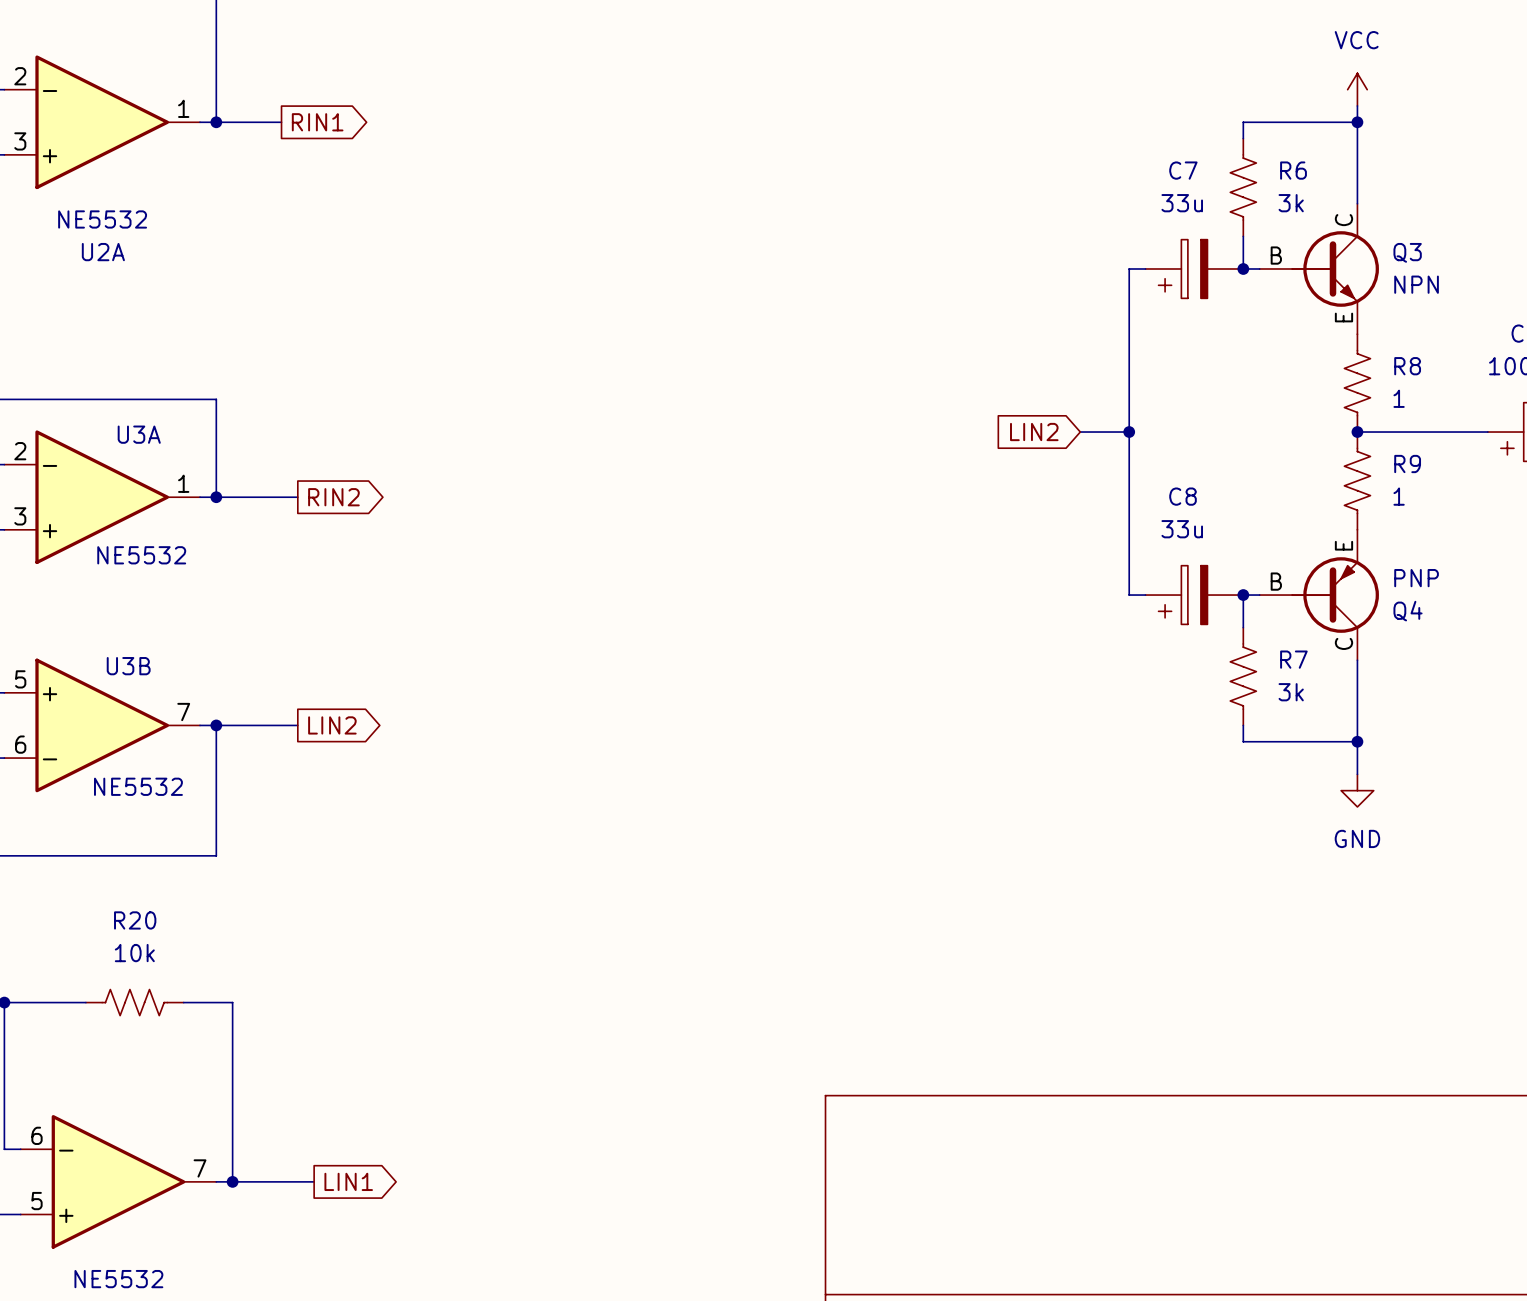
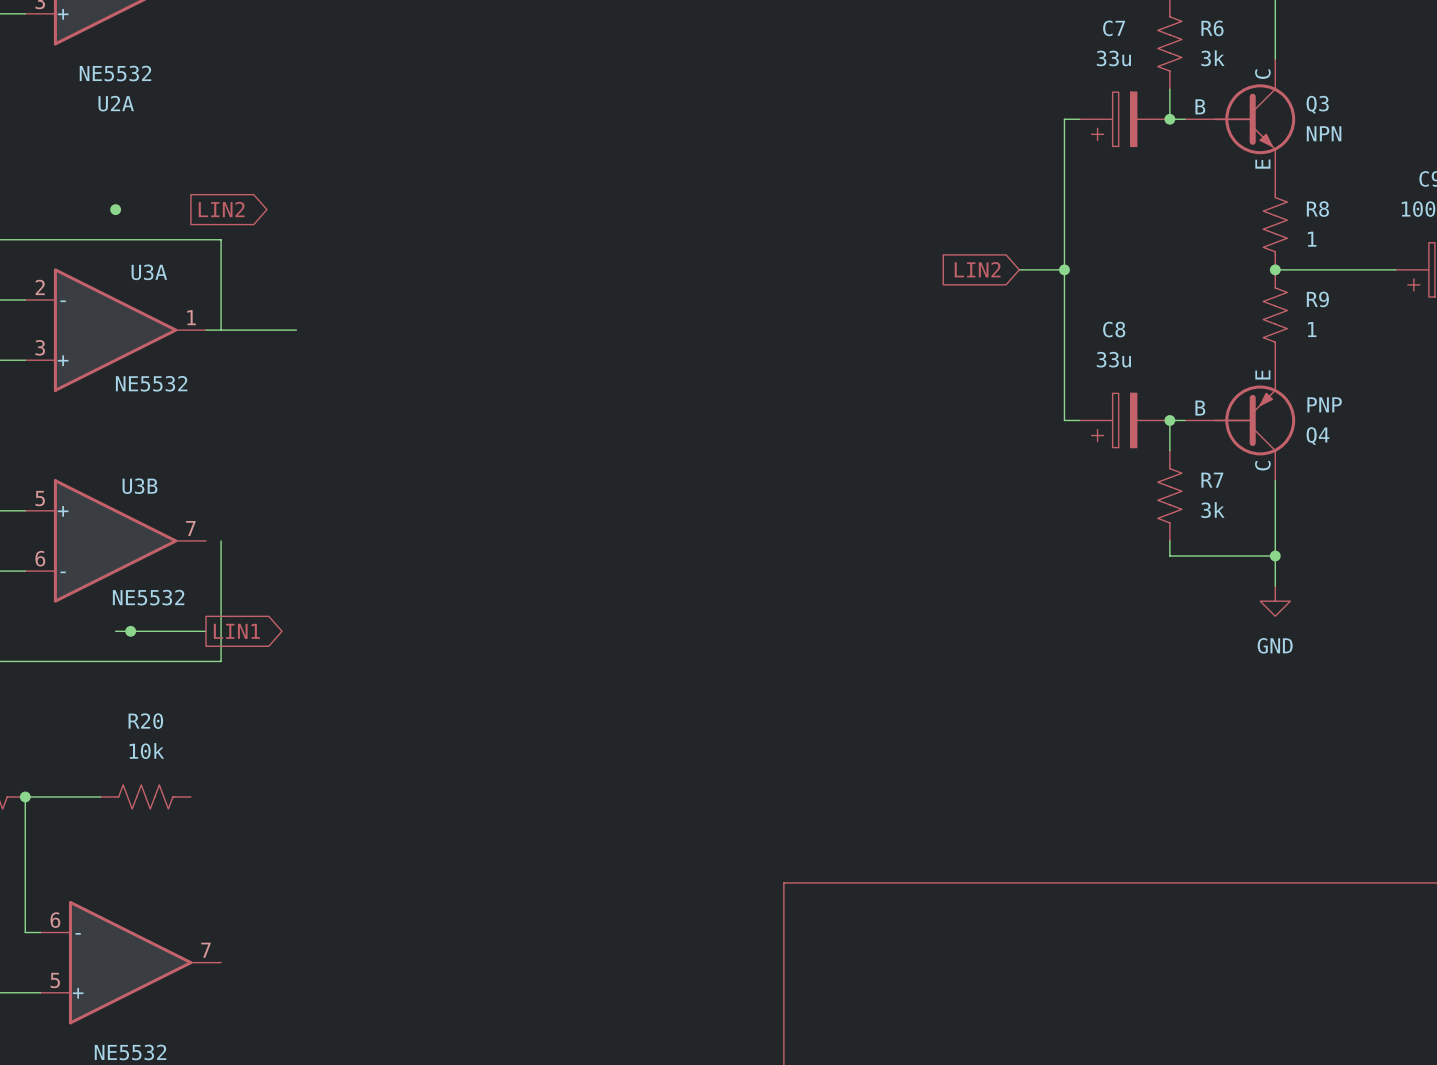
junction: none -> (115, 209)
global label: none -> LIN2 (221, 209)
junction: (216, 497) -> none
global label: RIN2 (333, 497) -> none
wire: (200, 725) (297, 725) -> (115, 631) (206, 631)
junction: (216, 725) -> none
global label: LIN2 (332, 725) -> none
junction: none -> (130, 631)
global label: none -> LIN1 (236, 631)
wire: (183, 1002) (232, 1002) (232, 1181) -> none
wire: (216, 1181) (314, 1181) -> none
junction: (232, 1181) -> none
global label: LIN1 (348, 1181) -> none

